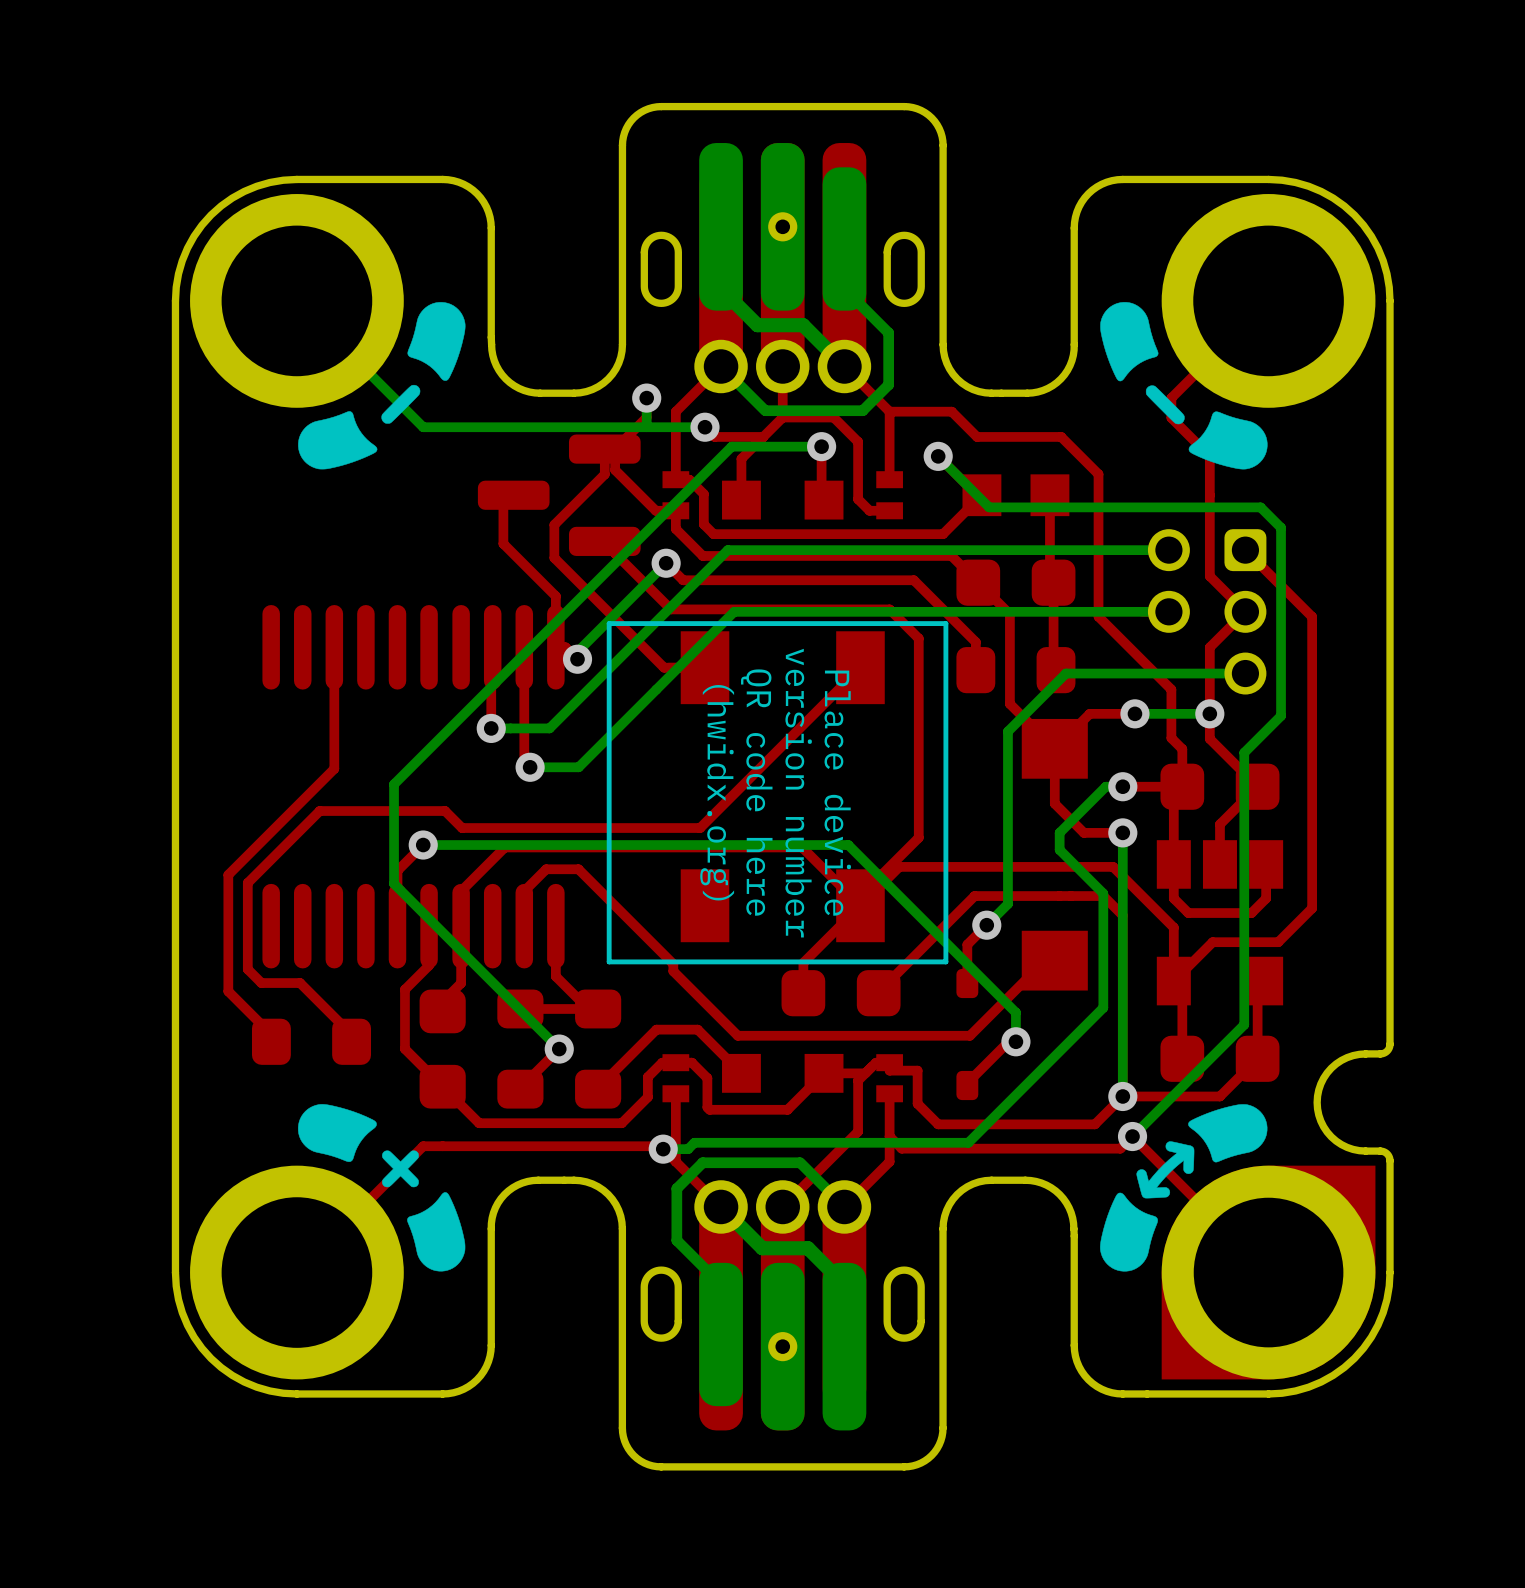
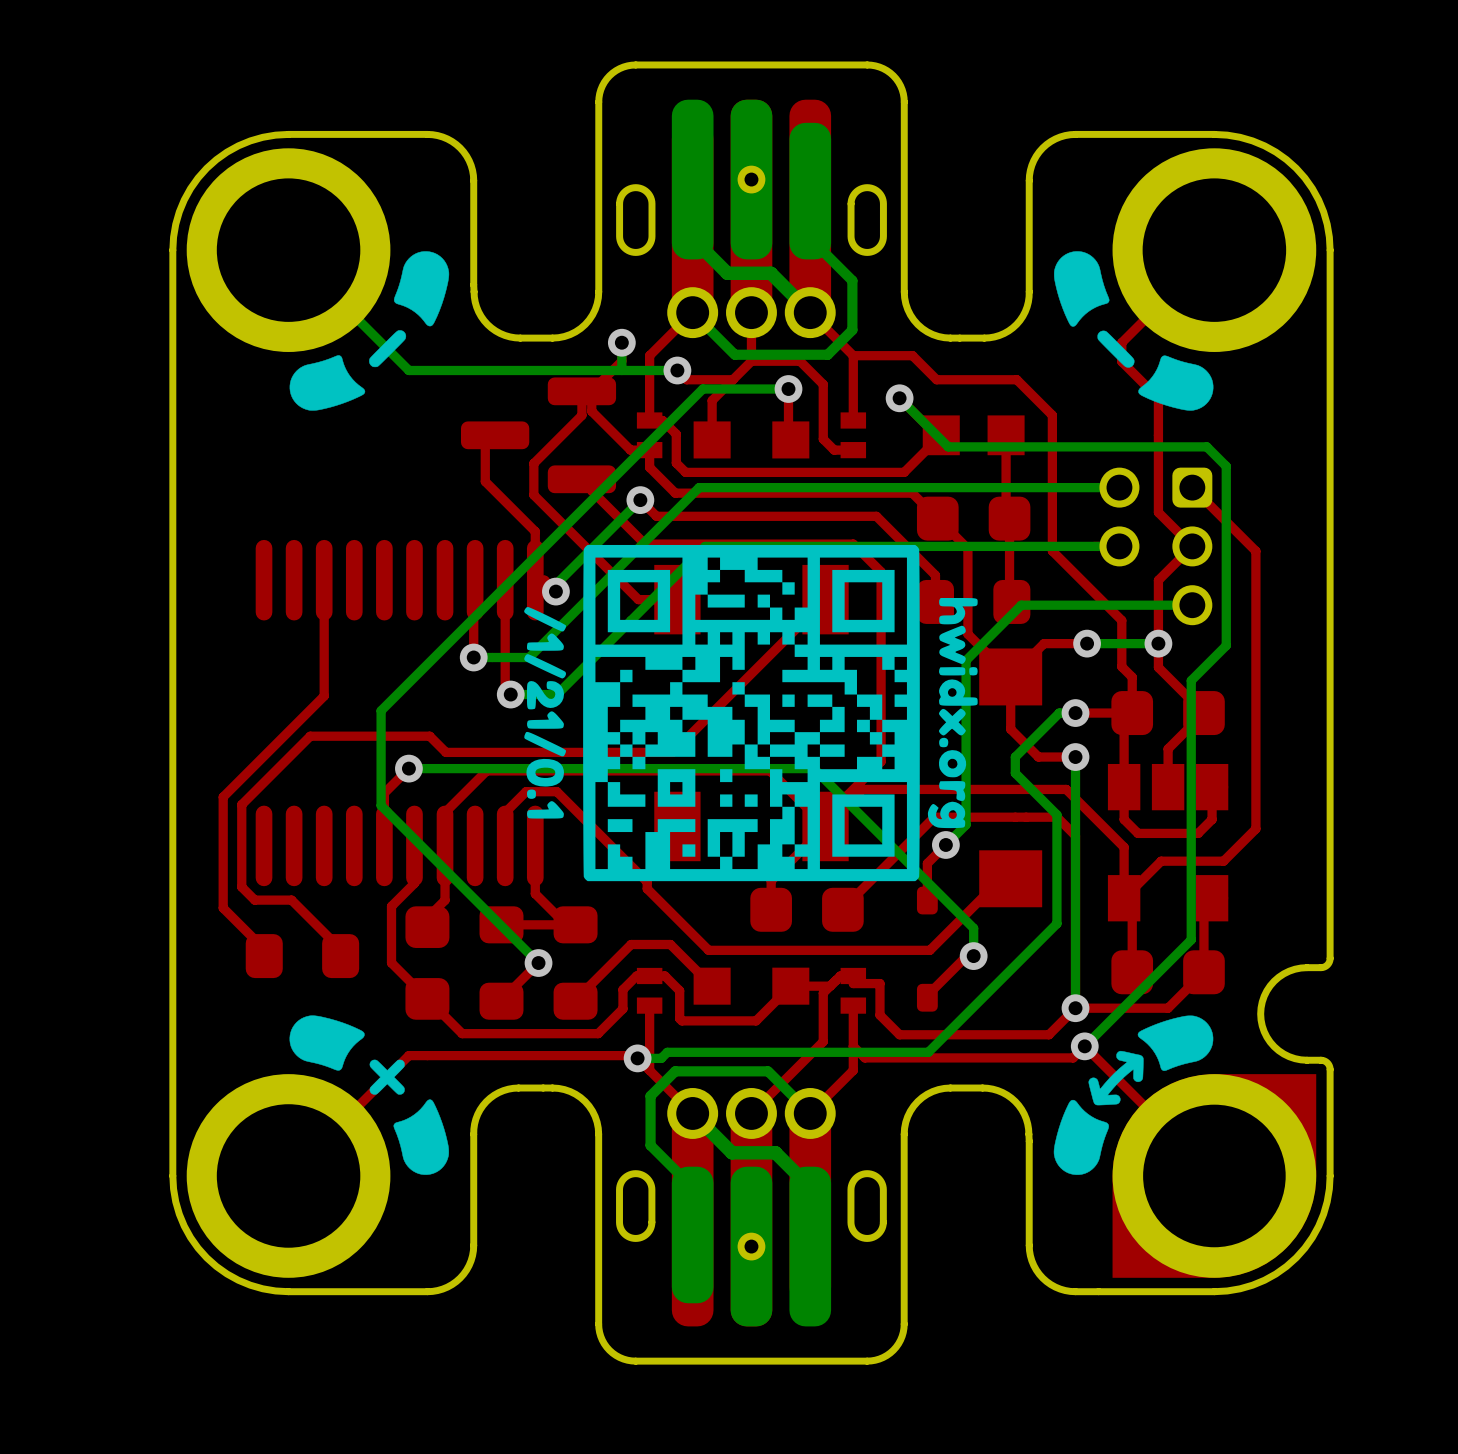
drawing: none -> [524, 544, 978, 882]
line: (945, 623) (609, 623) (609, 961) (945, 961) (945, 623) -> none
text: (hwidx.org) (717, 792) -> none
text: QR code here (756, 792) -> none
text: version number (798, 793) -> none
text: Place device (837, 793) -> none

